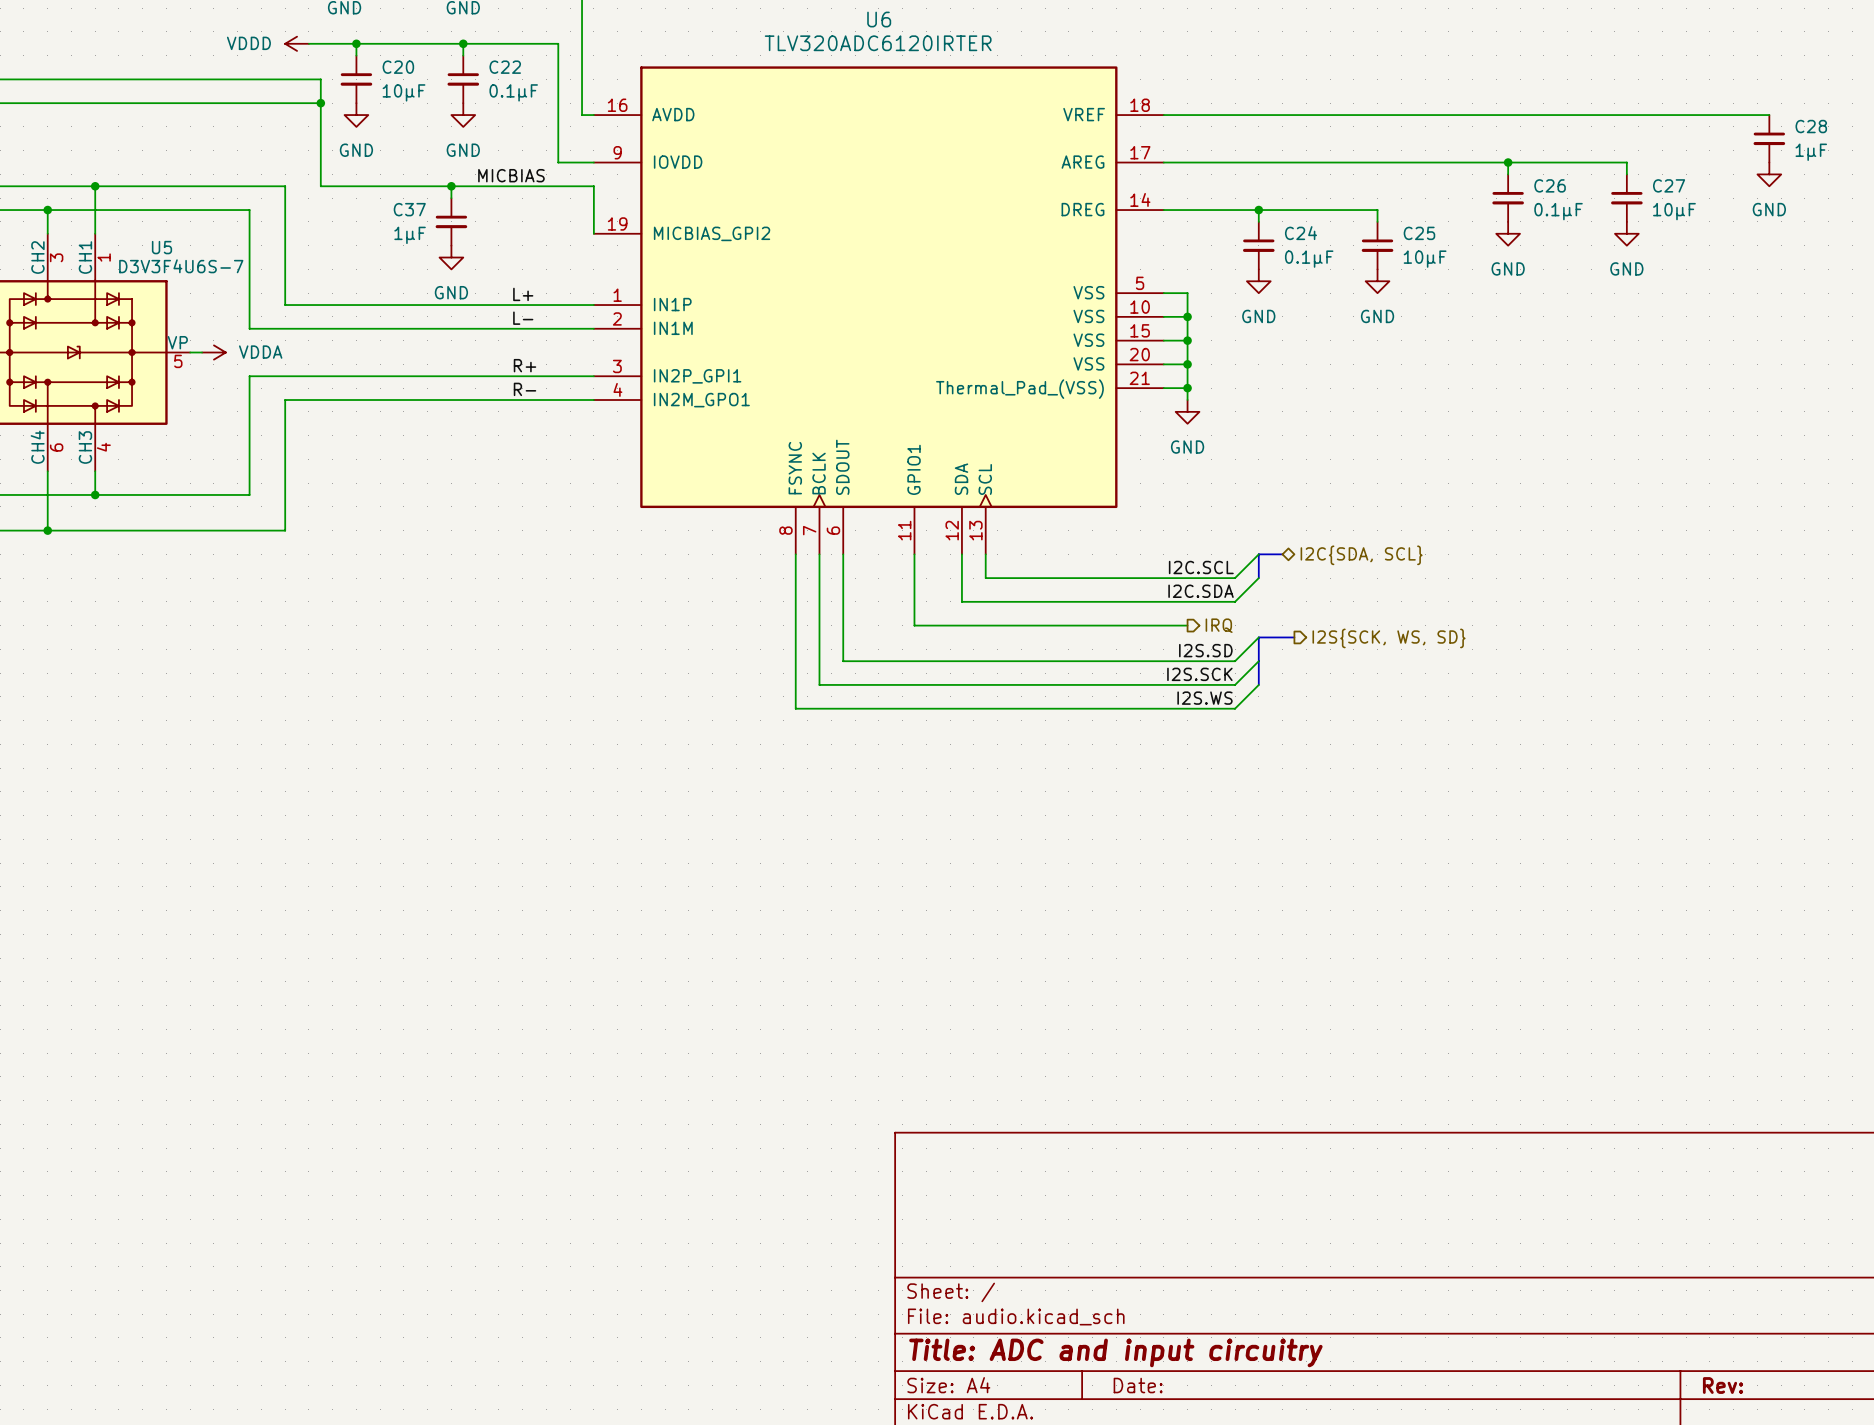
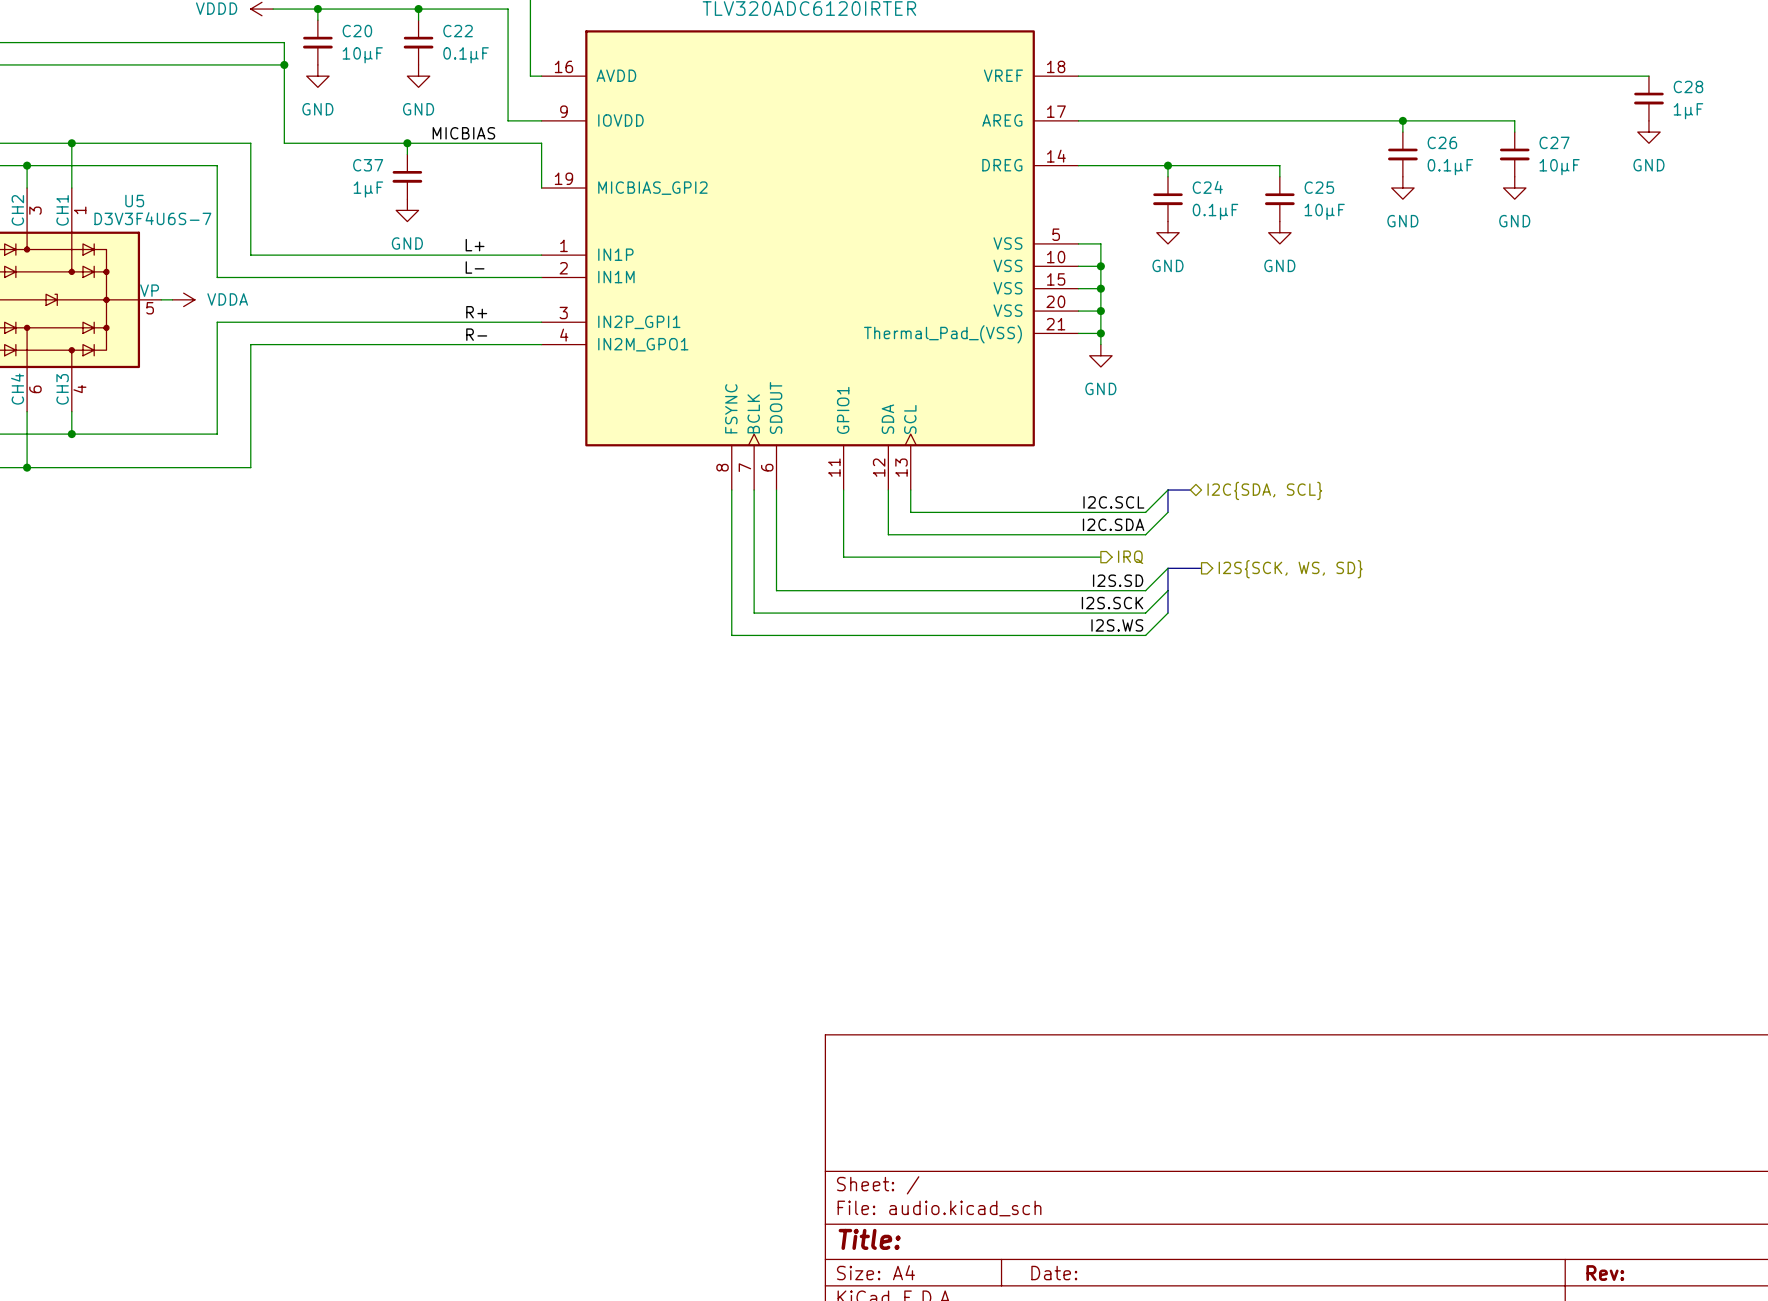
title block: Title: ADC and input circuitry (1115, 1352) -> Title: (869, 1239)

